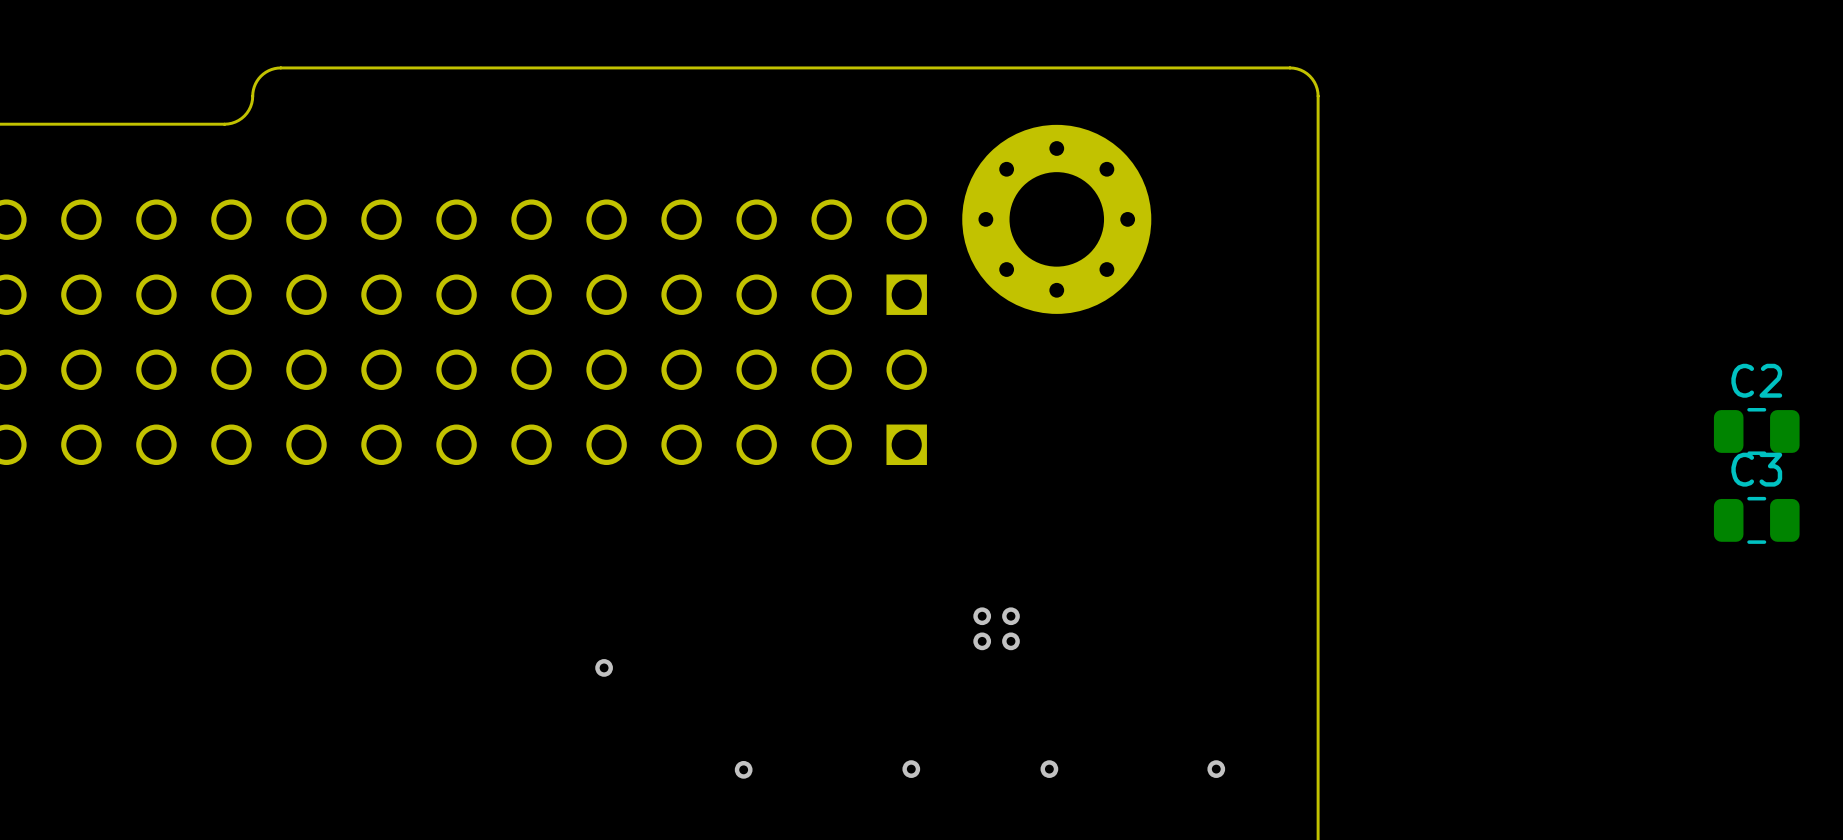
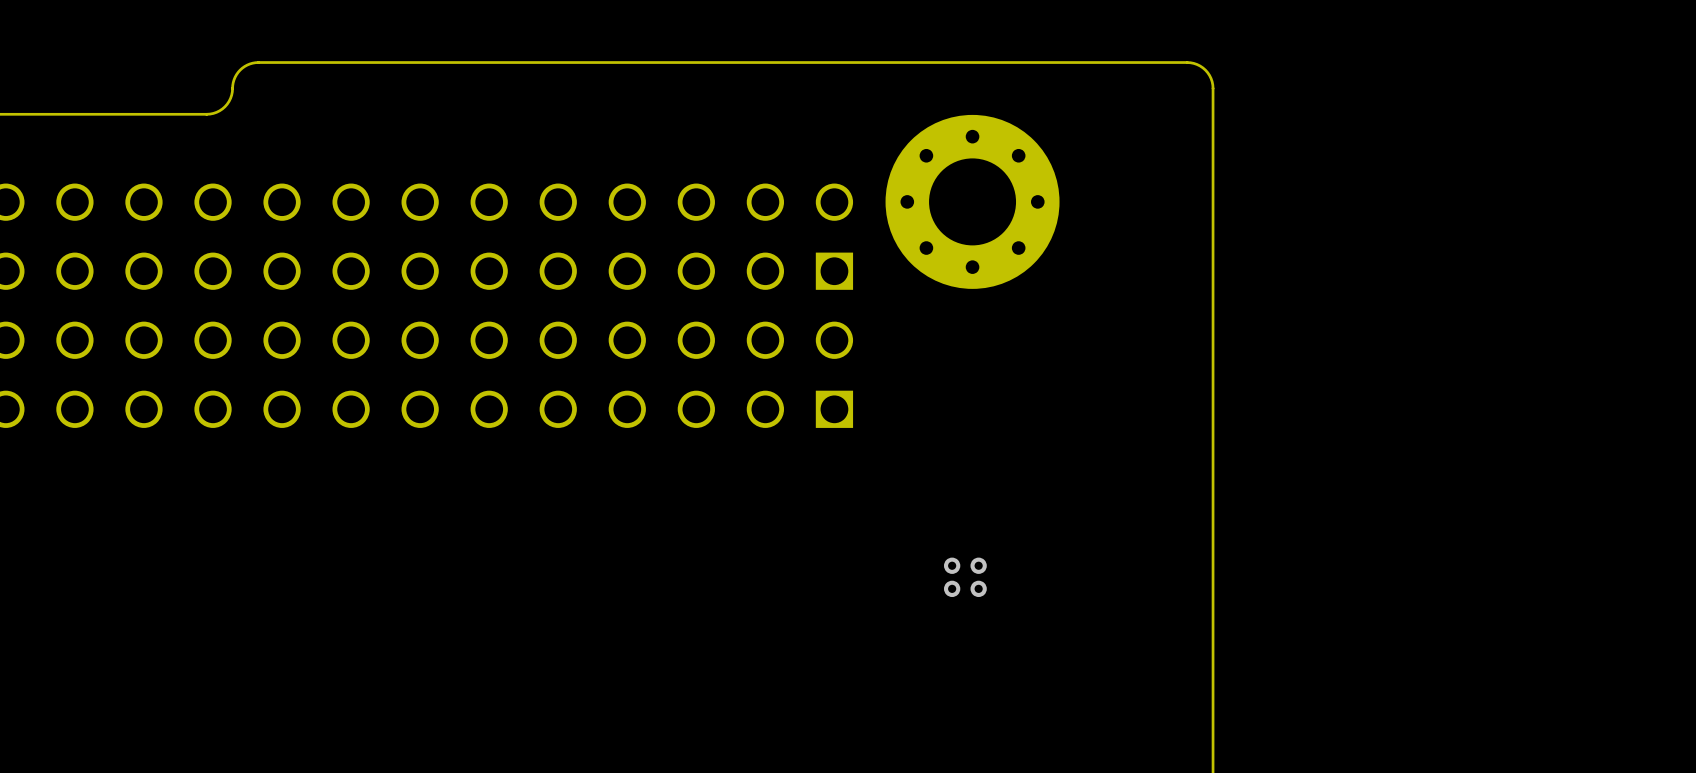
C2: (1756, 431) -> none
C3: (1756, 520) -> none
via: none -> (952, 565)
via: none -> (978, 565)
via: (982, 616) -> none
via: (1010, 616) -> none
via: none -> (952, 588)
via: none -> (978, 588)
via: (982, 641) -> none
via: (1010, 641) -> none
via: (604, 667) -> none
via: (743, 769) -> none
via: (911, 769) -> none
via: (1049, 769) -> none
via: (1216, 769) -> none

